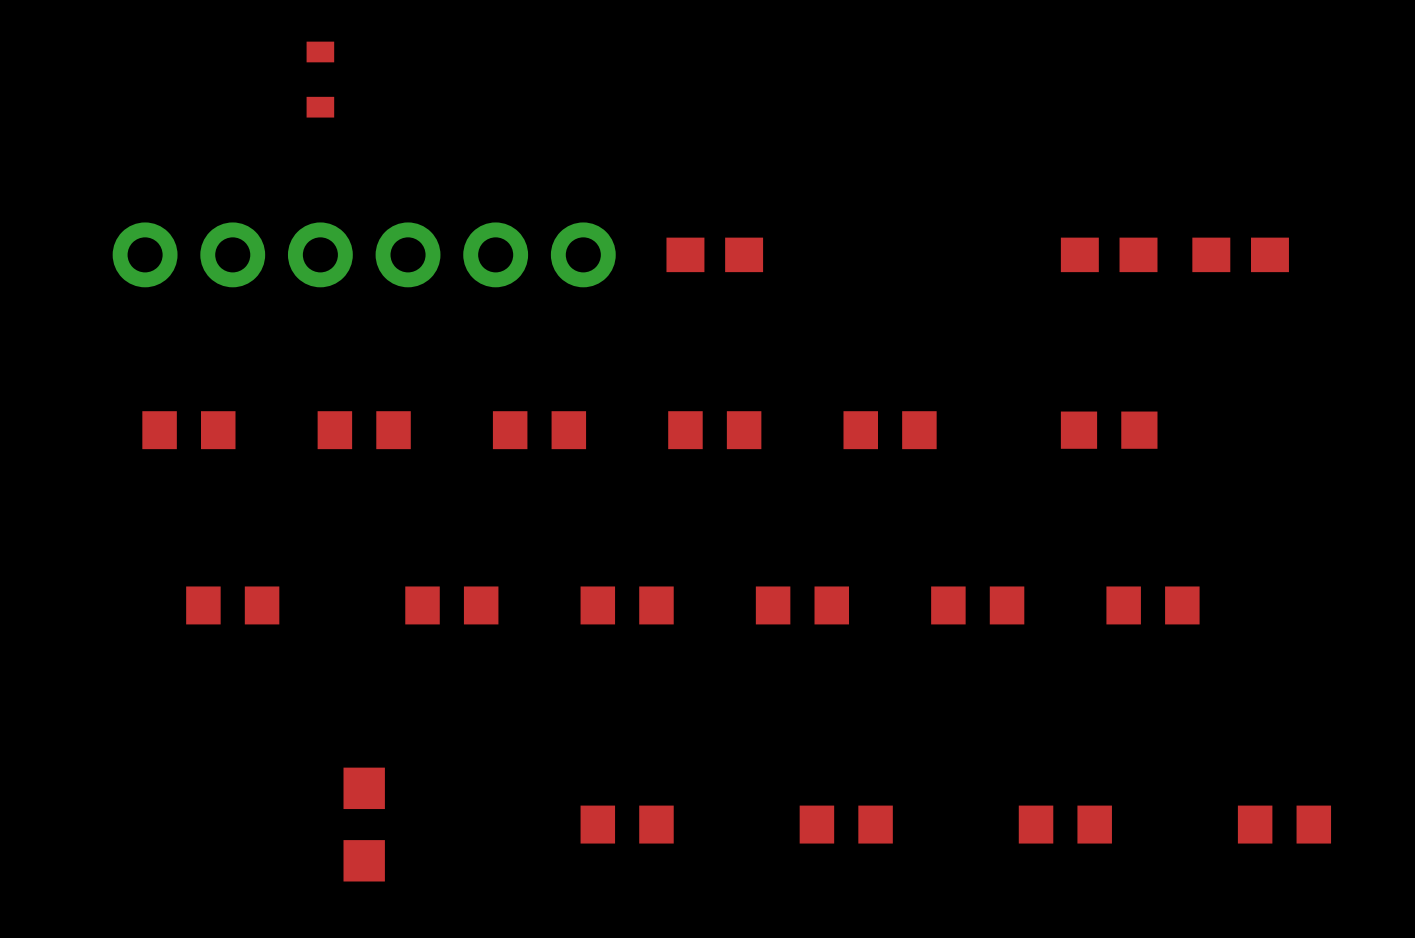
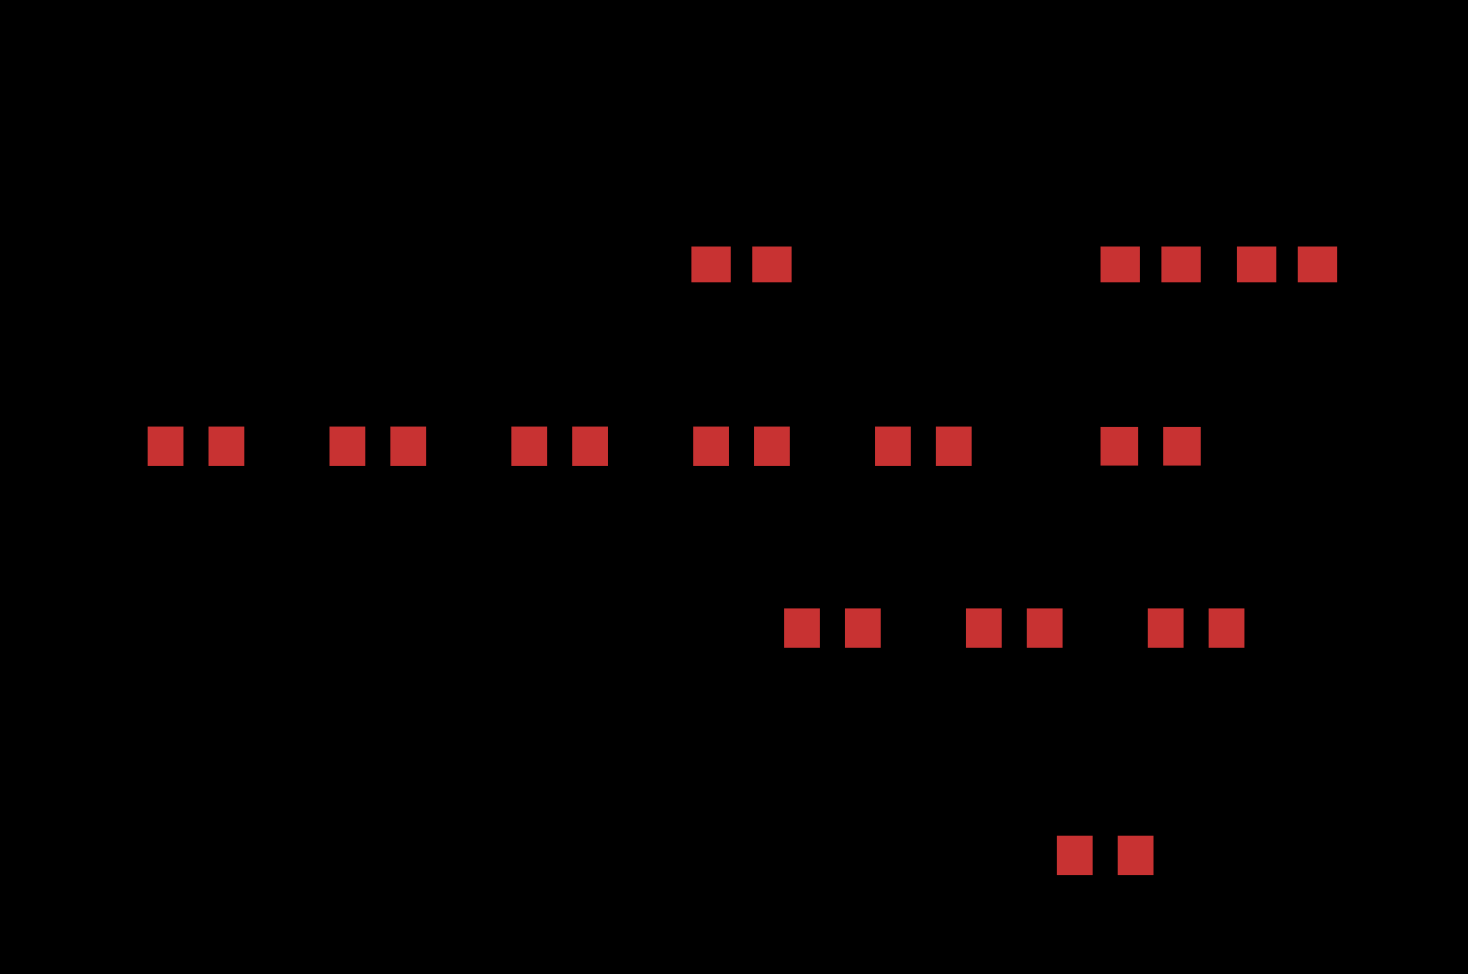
part: (320, 79) -> none
part: (364, 254) -> none
part: (232, 605) -> none
part: (451, 605) -> none
part: (627, 605) -> none
part: (364, 824) -> none
part: (627, 824) -> none
part: (846, 824) -> none
part: (1284, 824) -> none

